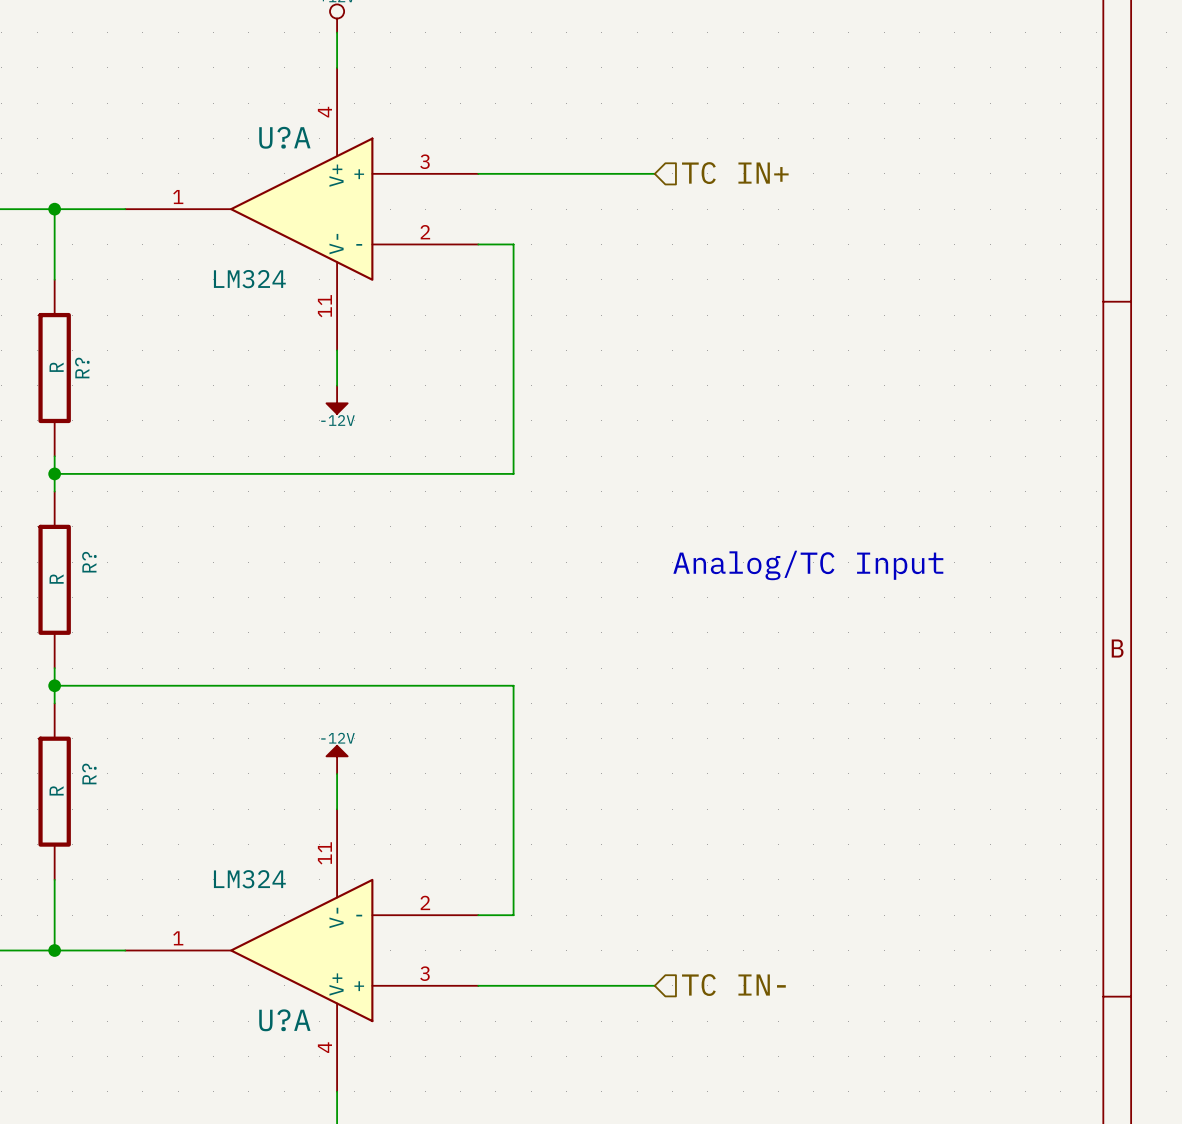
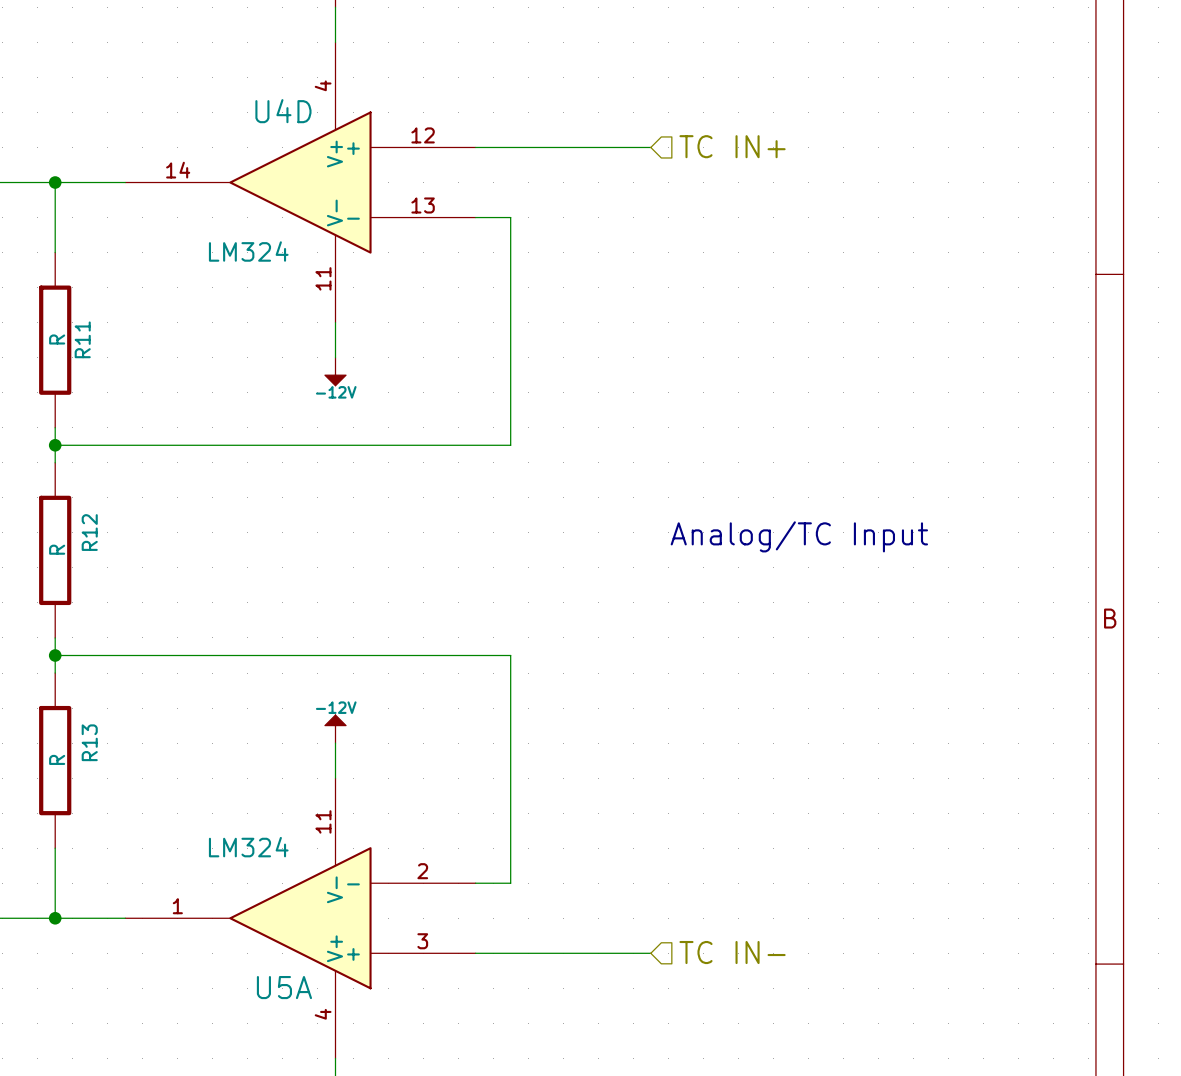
U?A name: U?A (284, 137) -> U4D (283, 111)
U?A pin number: 3 (424, 161) -> 12 (423, 135)
U?A pin number: 1 (178, 197) -> 14 (178, 170)
U?A pin number: 2 (425, 232) -> 13 (423, 205)
R? name: R? (82, 368) -> R11 (82, 339)
R? name: R? (89, 562) -> R12 (89, 532)
R? name: R? (89, 773) -> R13 (89, 742)
U?A name: U?A (284, 1020) -> U5A (284, 987)

